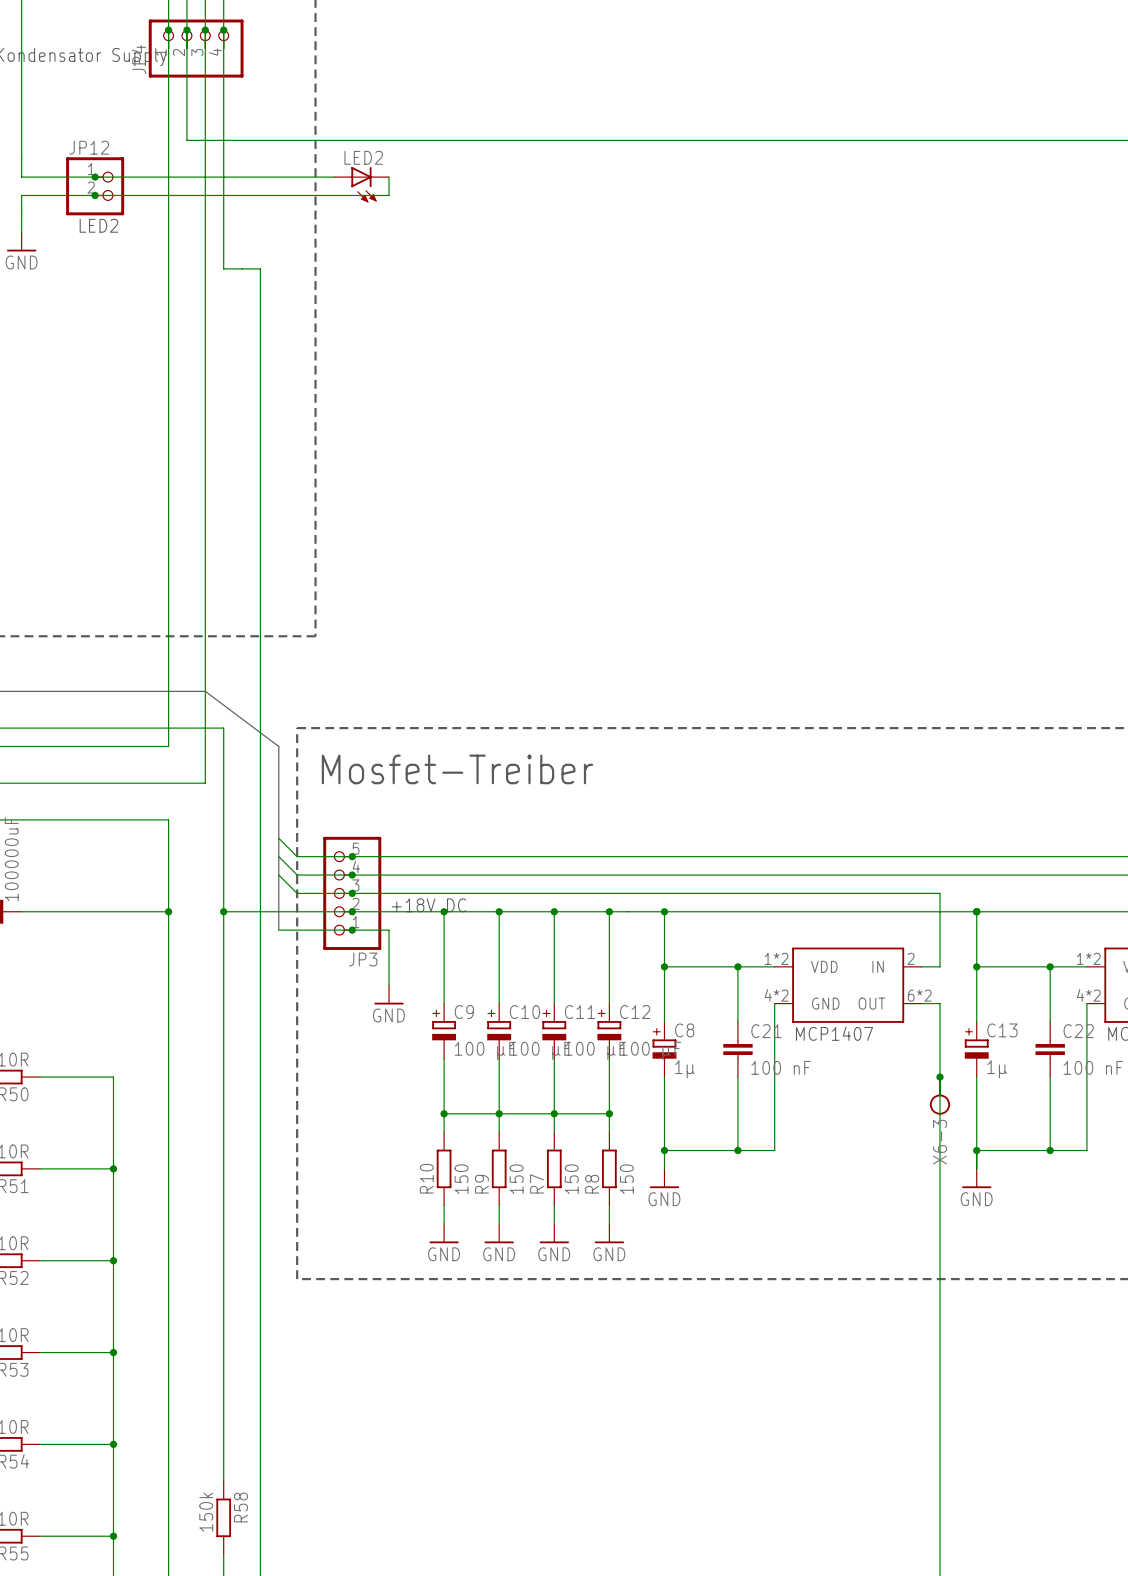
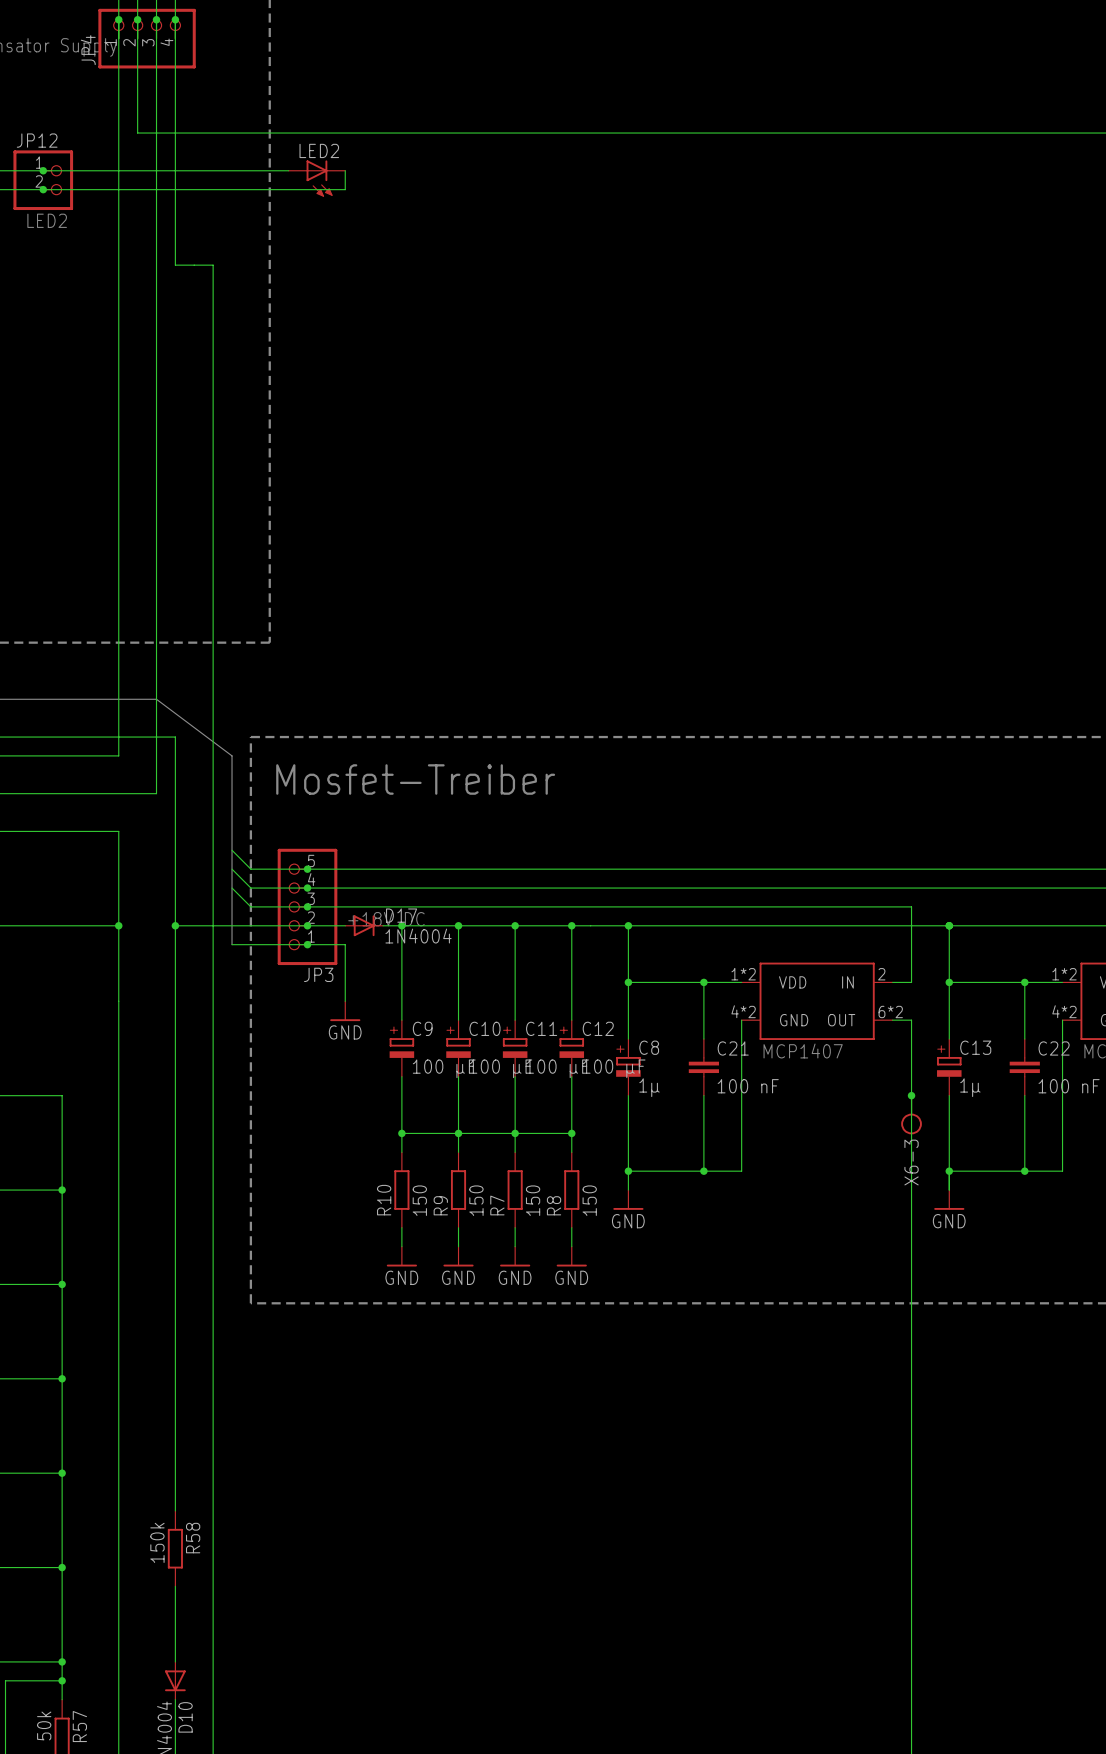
D17: none -> 1N4004 (364, 925)

